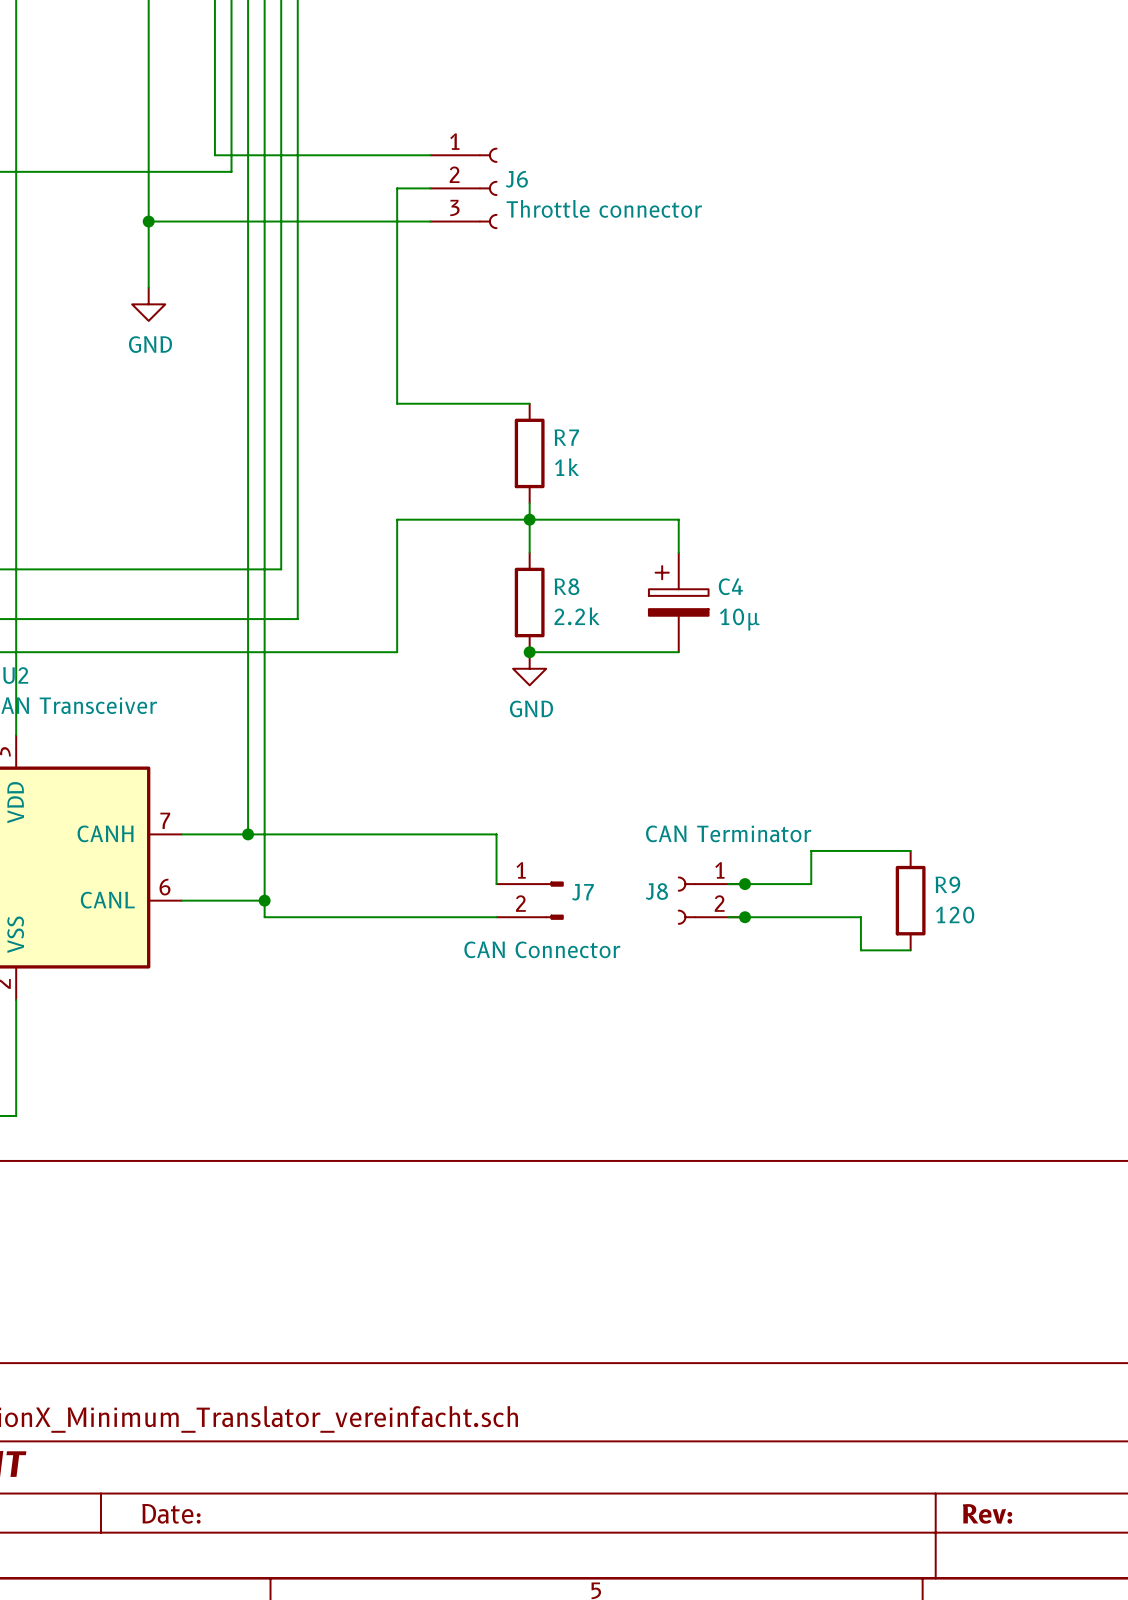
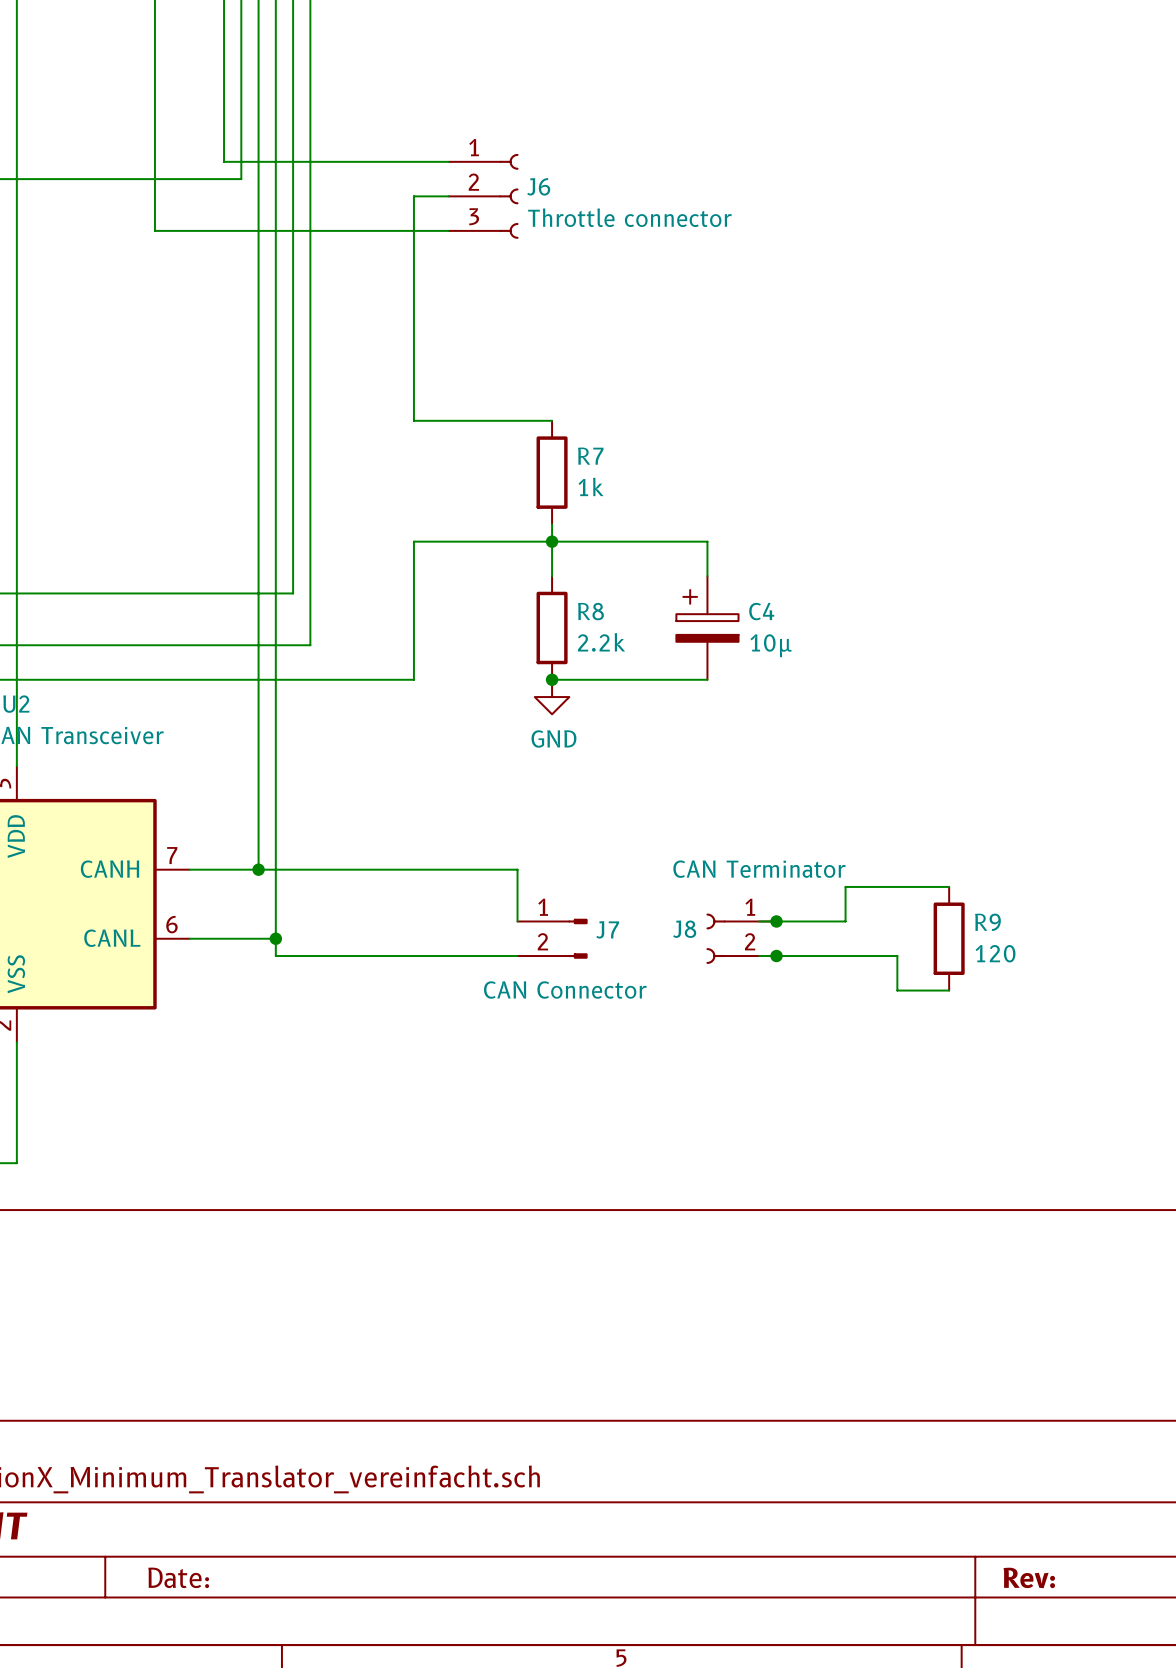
wire: (148, 221) (148, 287) -> none
junction: (148, 221) -> none
power symbol: GND (148, 304) -> none

